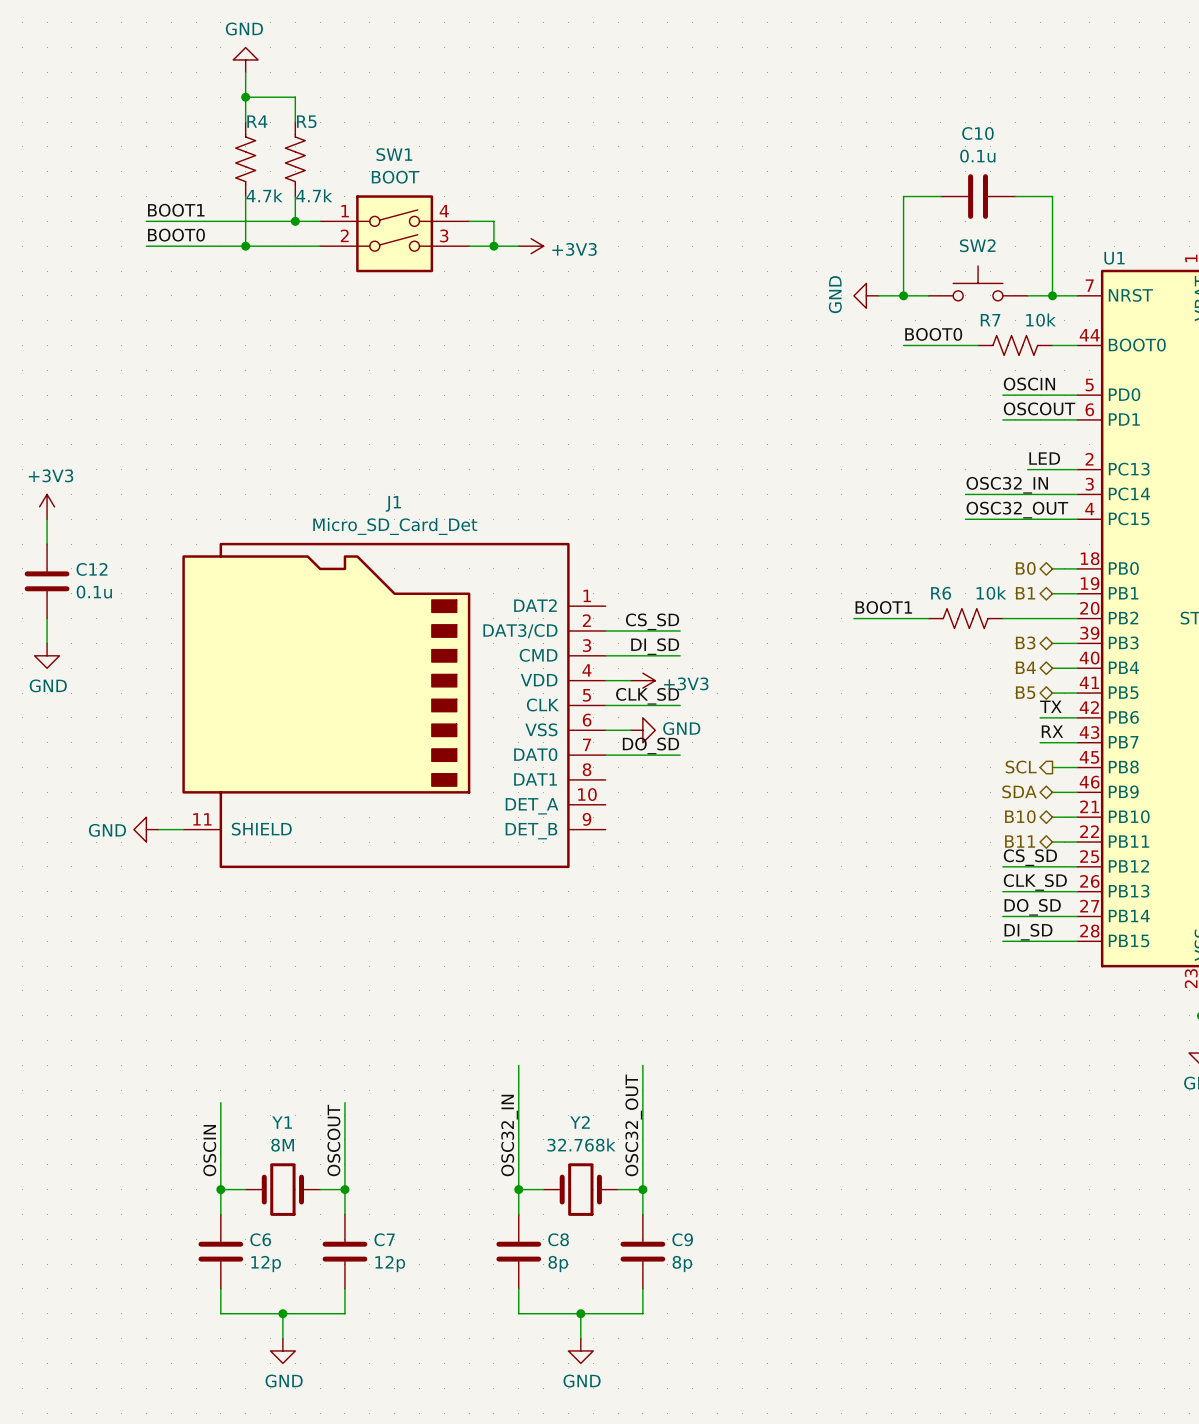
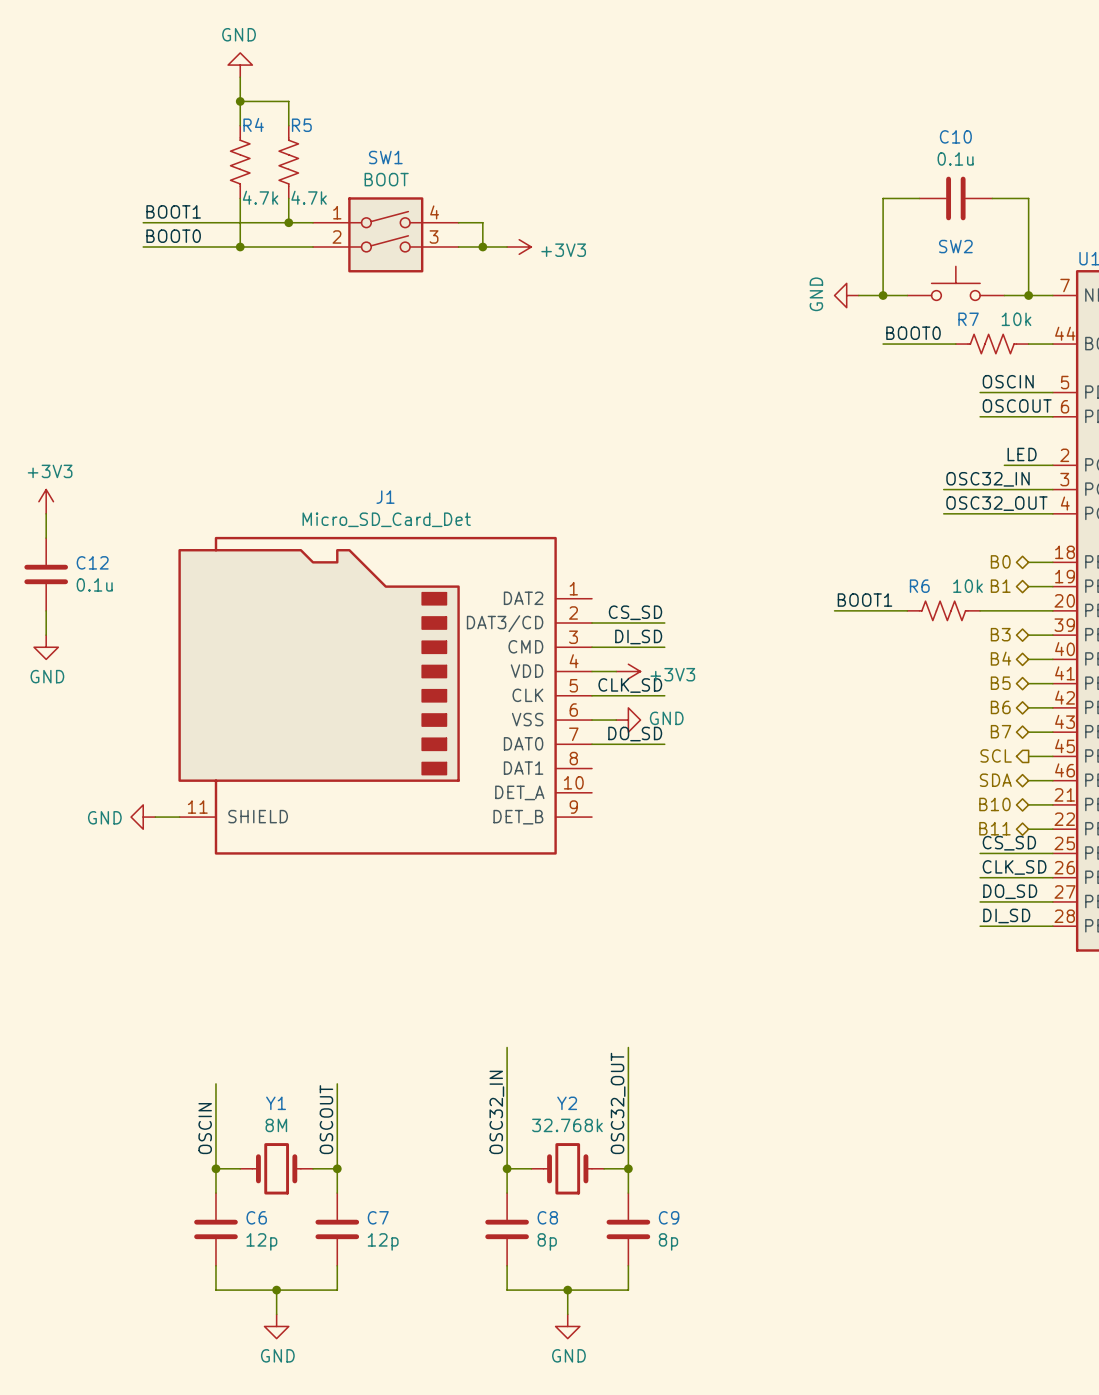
label: TX (1050, 706) -> none
hierarchical label: none -> B6 (1000, 707)
wire: (1040, 717) (1052, 717) -> none
label: RX (1052, 731) -> none
hierarchical label: none -> B7 (1001, 731)
wire: (1040, 742) (1052, 742) -> none

